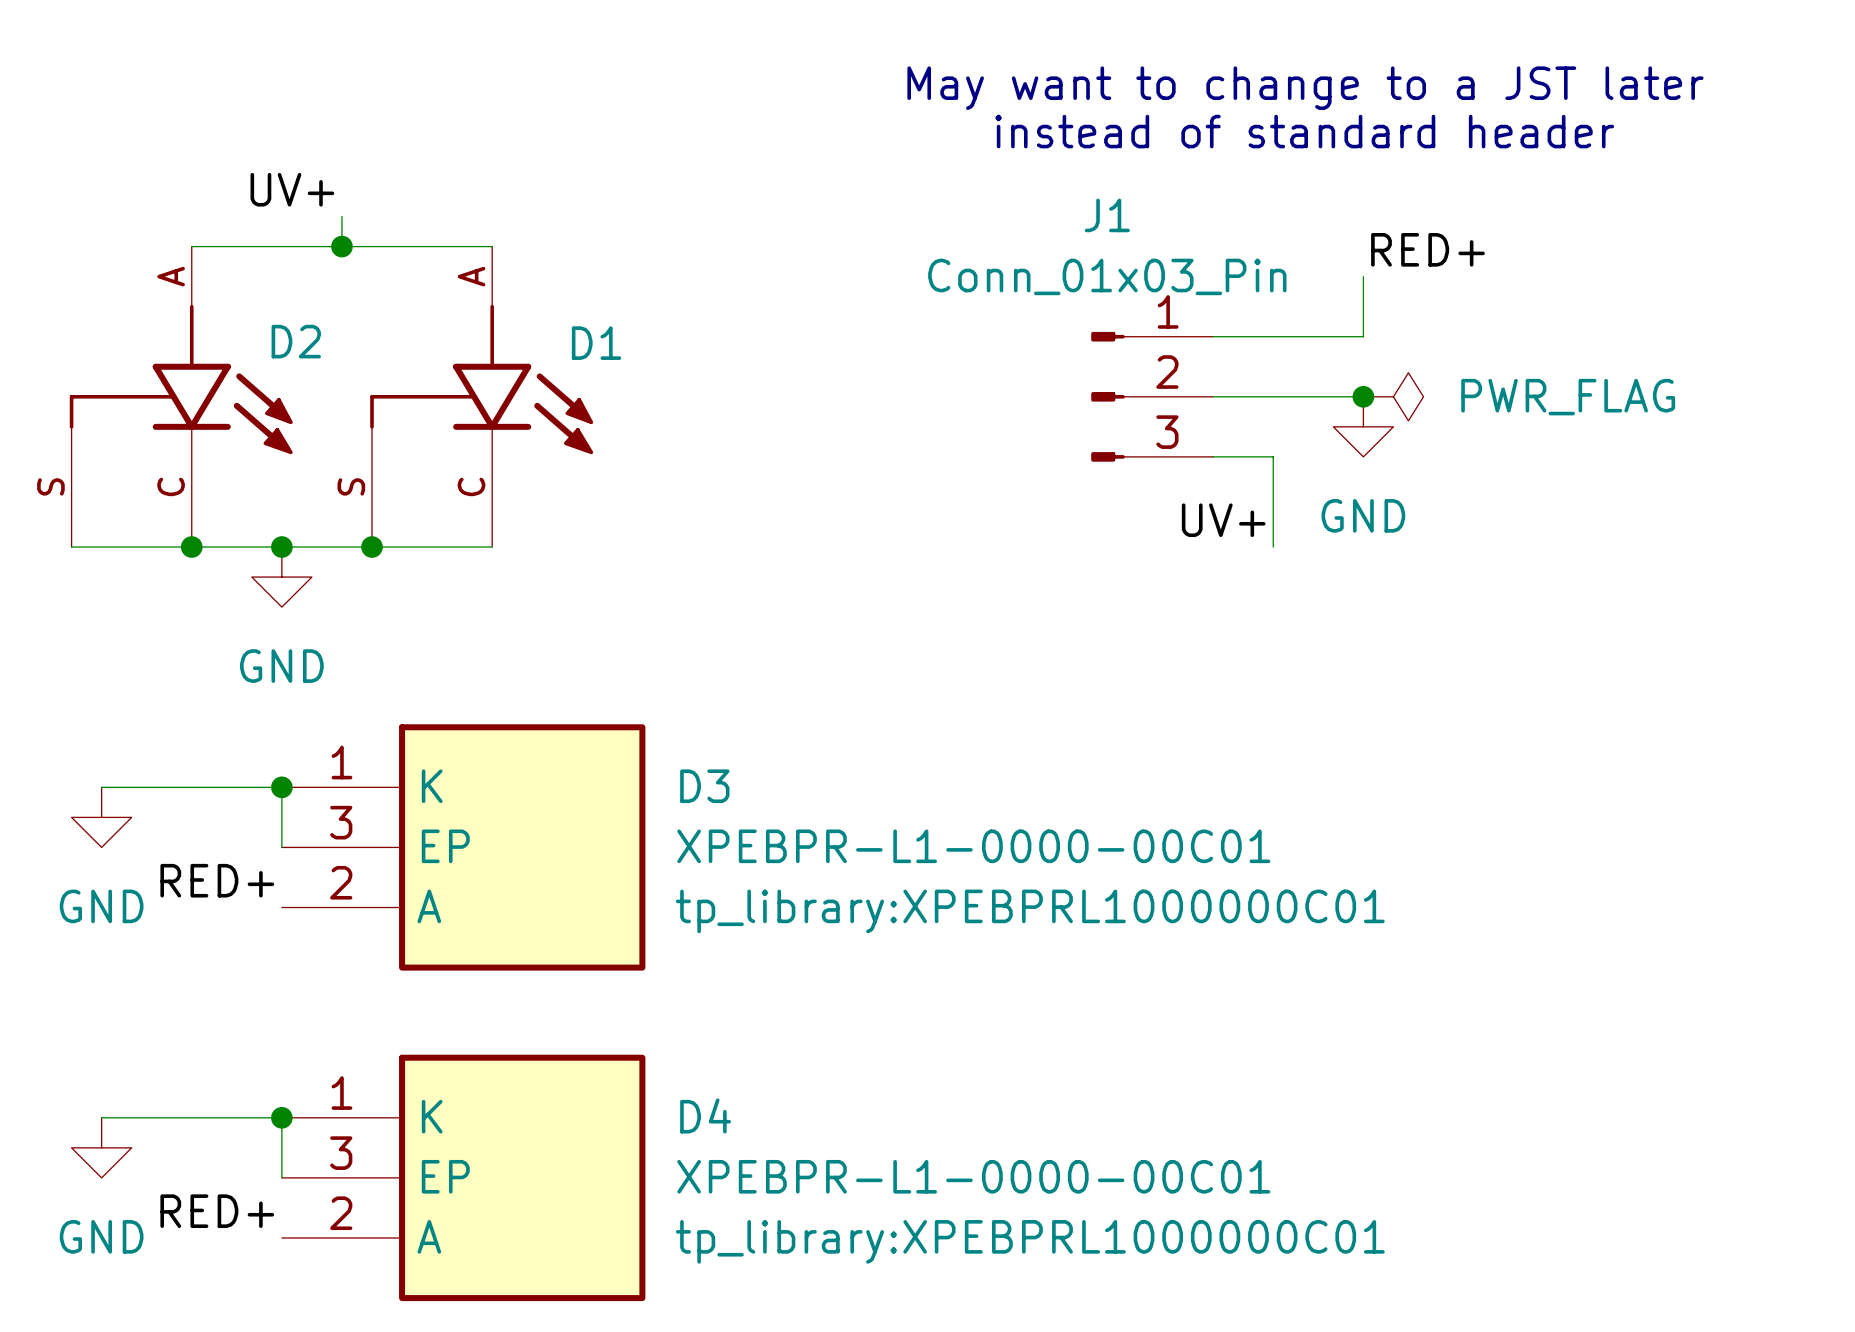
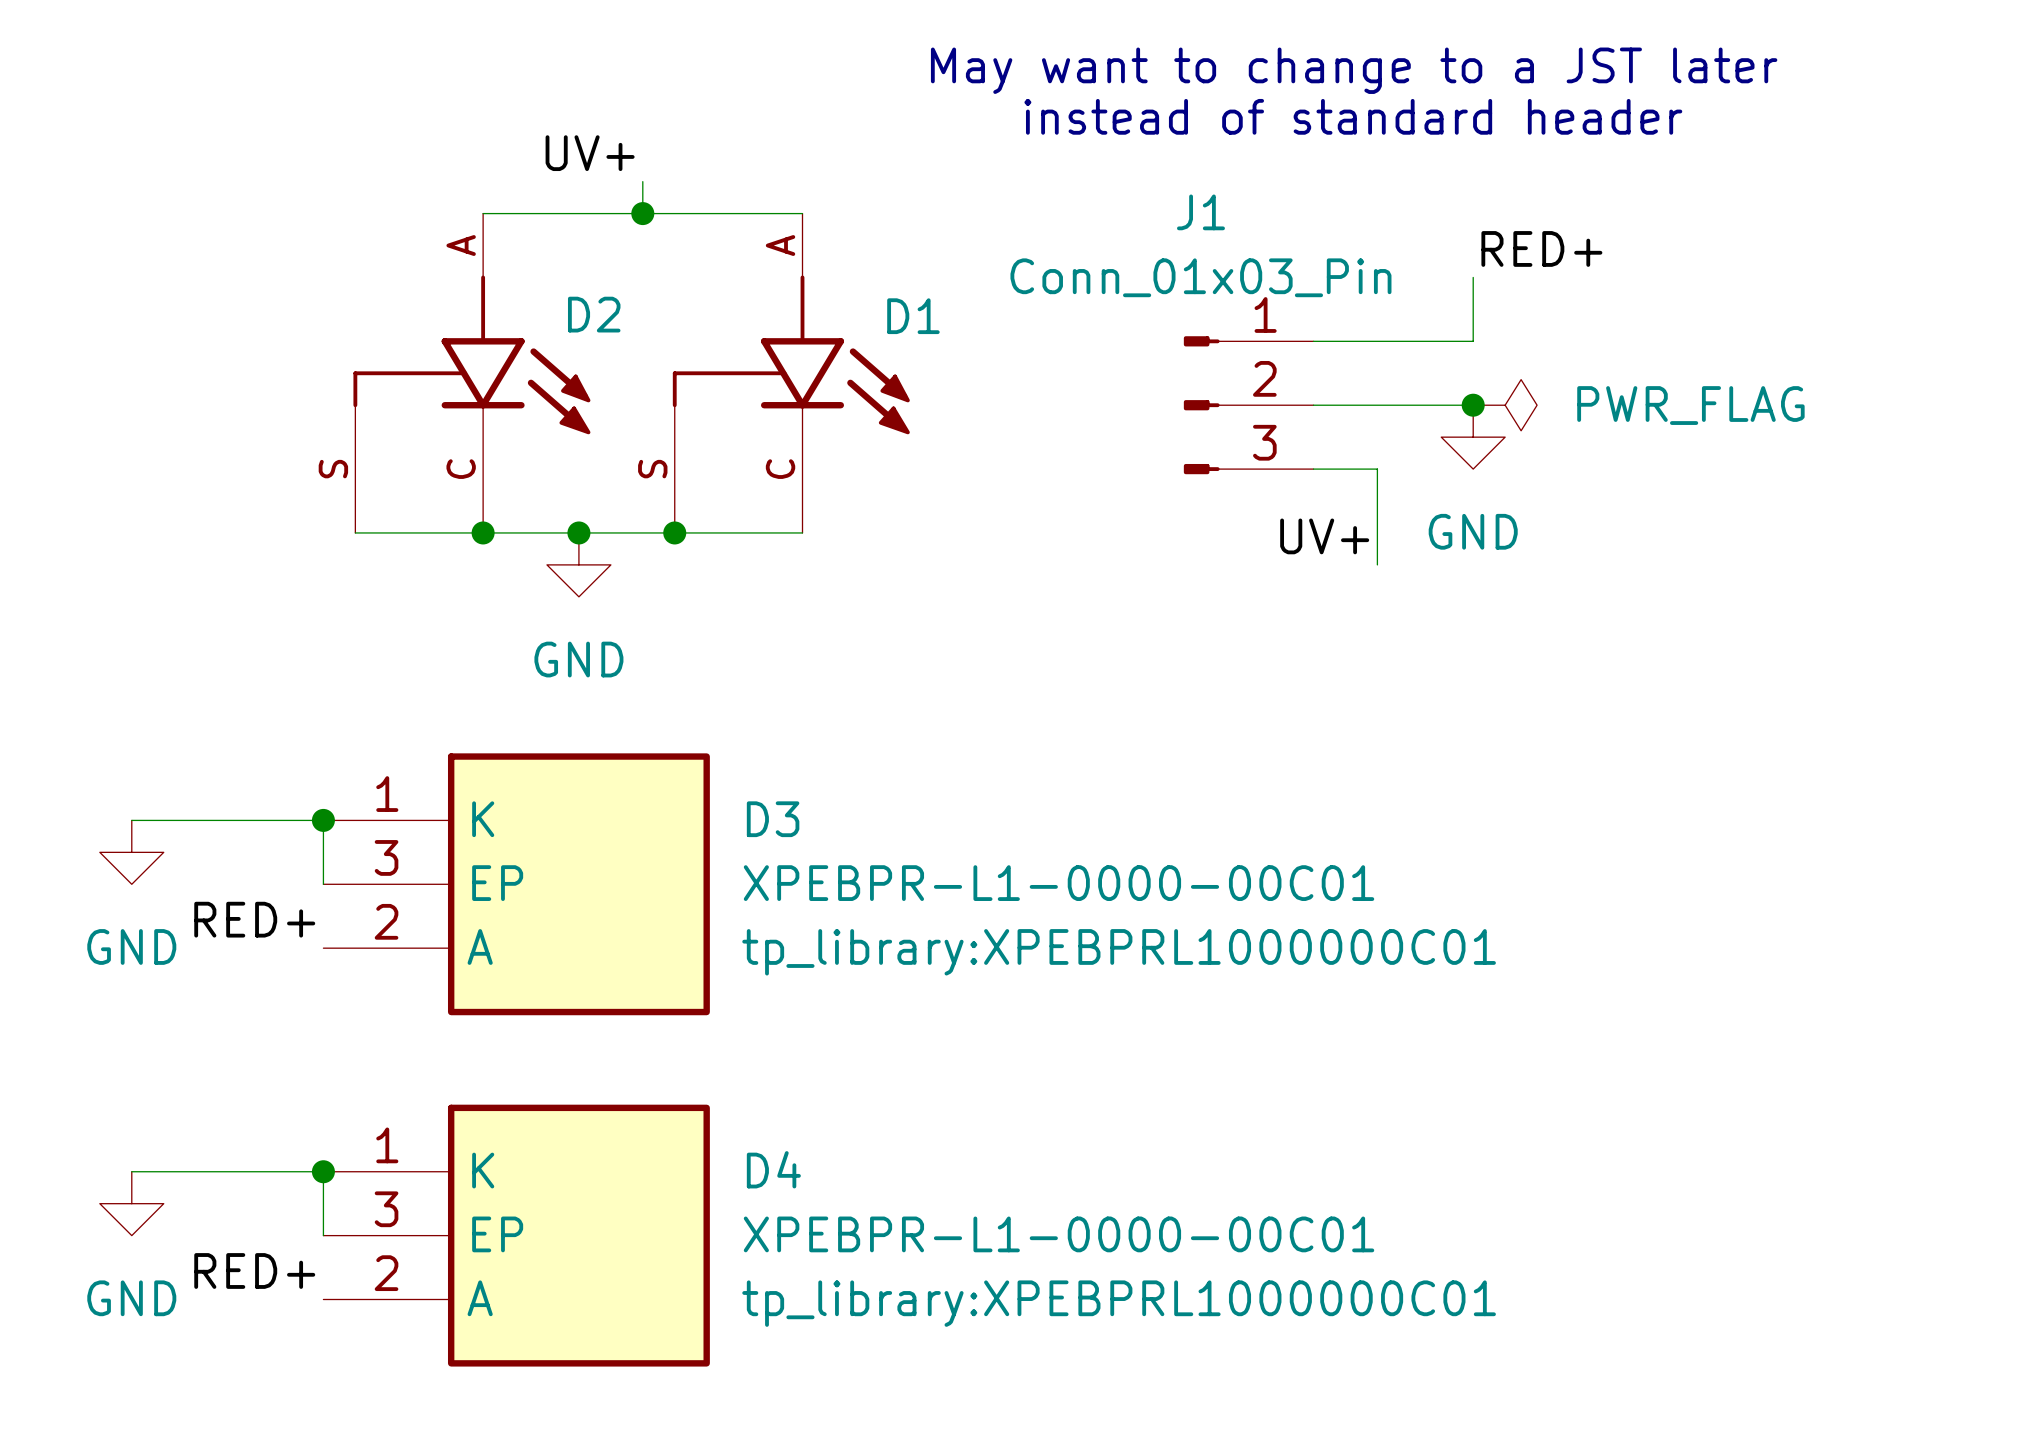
text position: May want to change to a JST later (1305, 88) -> May want to change to a JST later (1354, 70)
text position: instead of standard header (1304, 131) -> instead of standard header (1353, 116)
label position: UV+ (292, 189) -> UV+ (590, 153)
wire: (341, 216) (341, 246) -> (642, 181) (642, 213)
junction: none -> (642, 213)
wire: (191, 246) (492, 246) -> (483, 213) (802, 213)
junction: (341, 246) -> none
D2 position: (181, 396) -> (471, 373)
D1 position: (481, 396) -> (791, 373)
junction: none -> (578, 532)
junction: none -> (674, 532)
wire: (71, 547) (492, 547) -> (355, 532) (802, 532)
junction: (191, 547) -> none
junction: (281, 547) -> none
junction position: (372, 547) -> (483, 532)
power symbol position: GND (281, 577) -> GND (578, 564)

